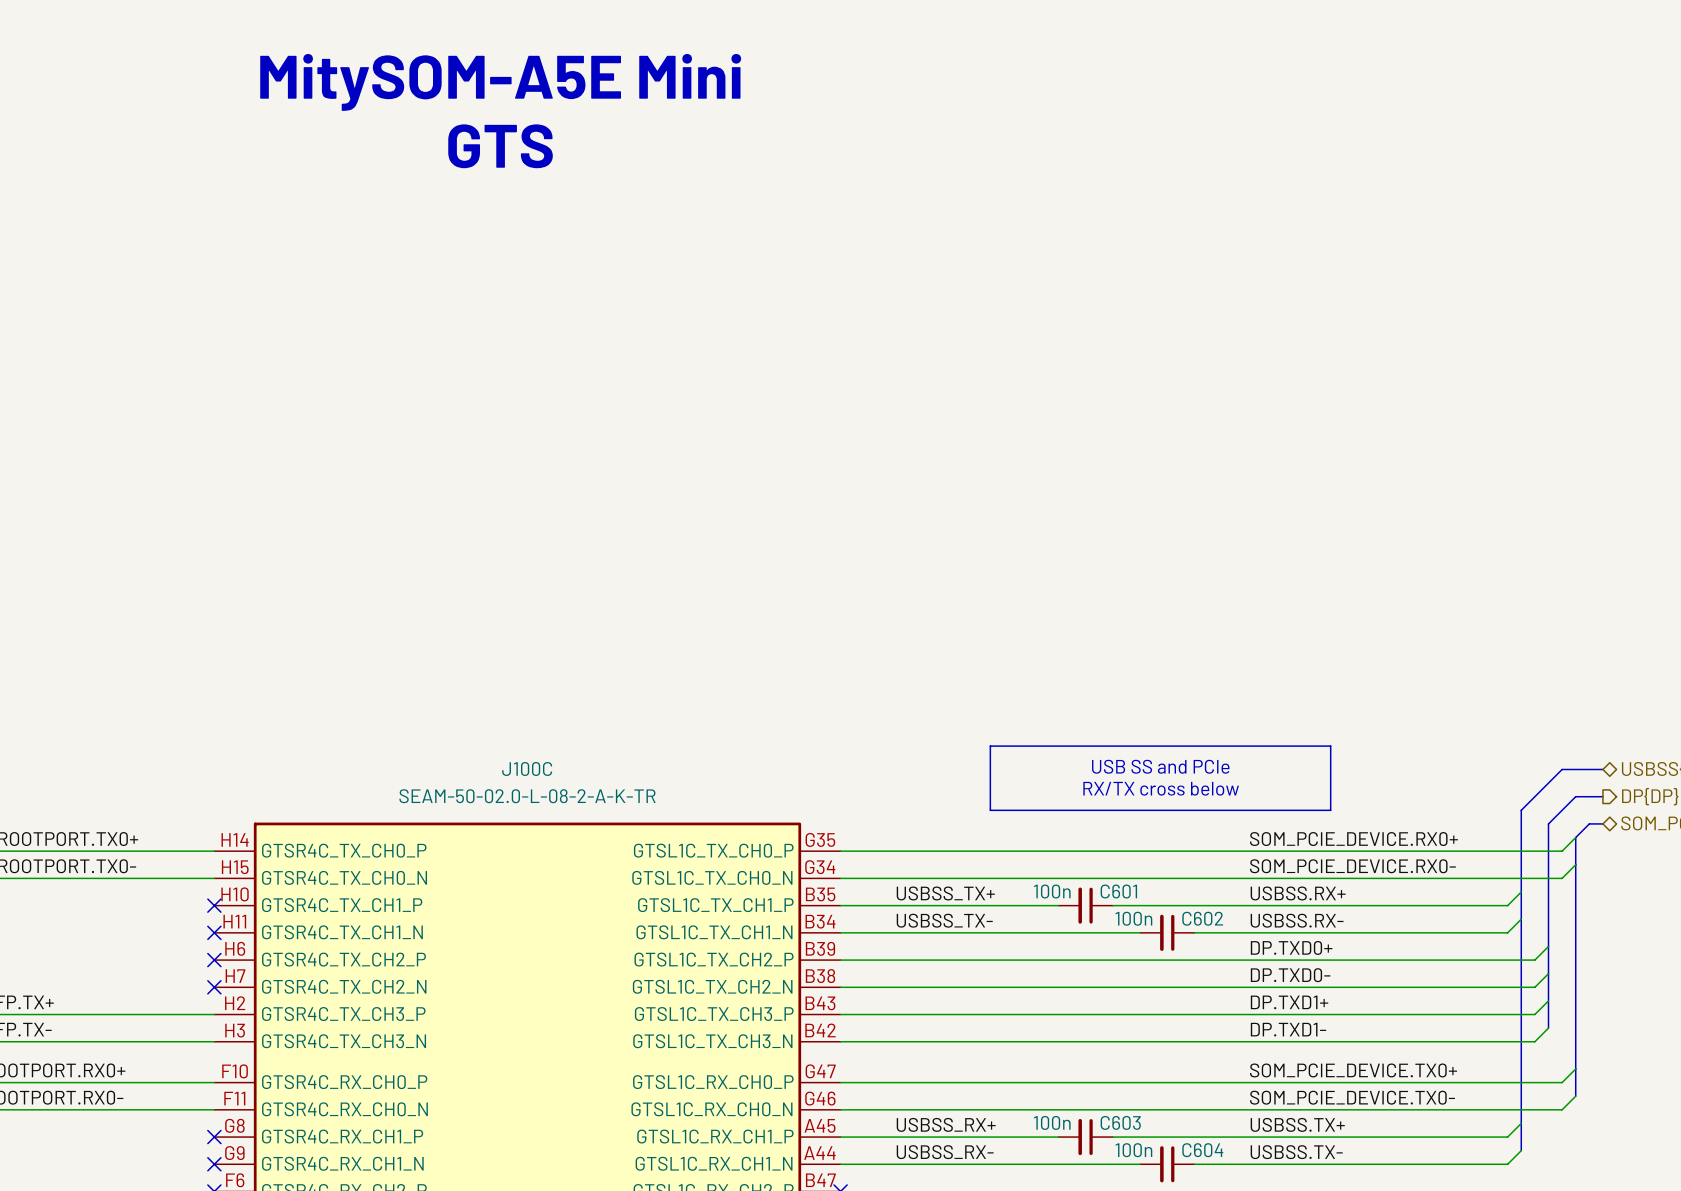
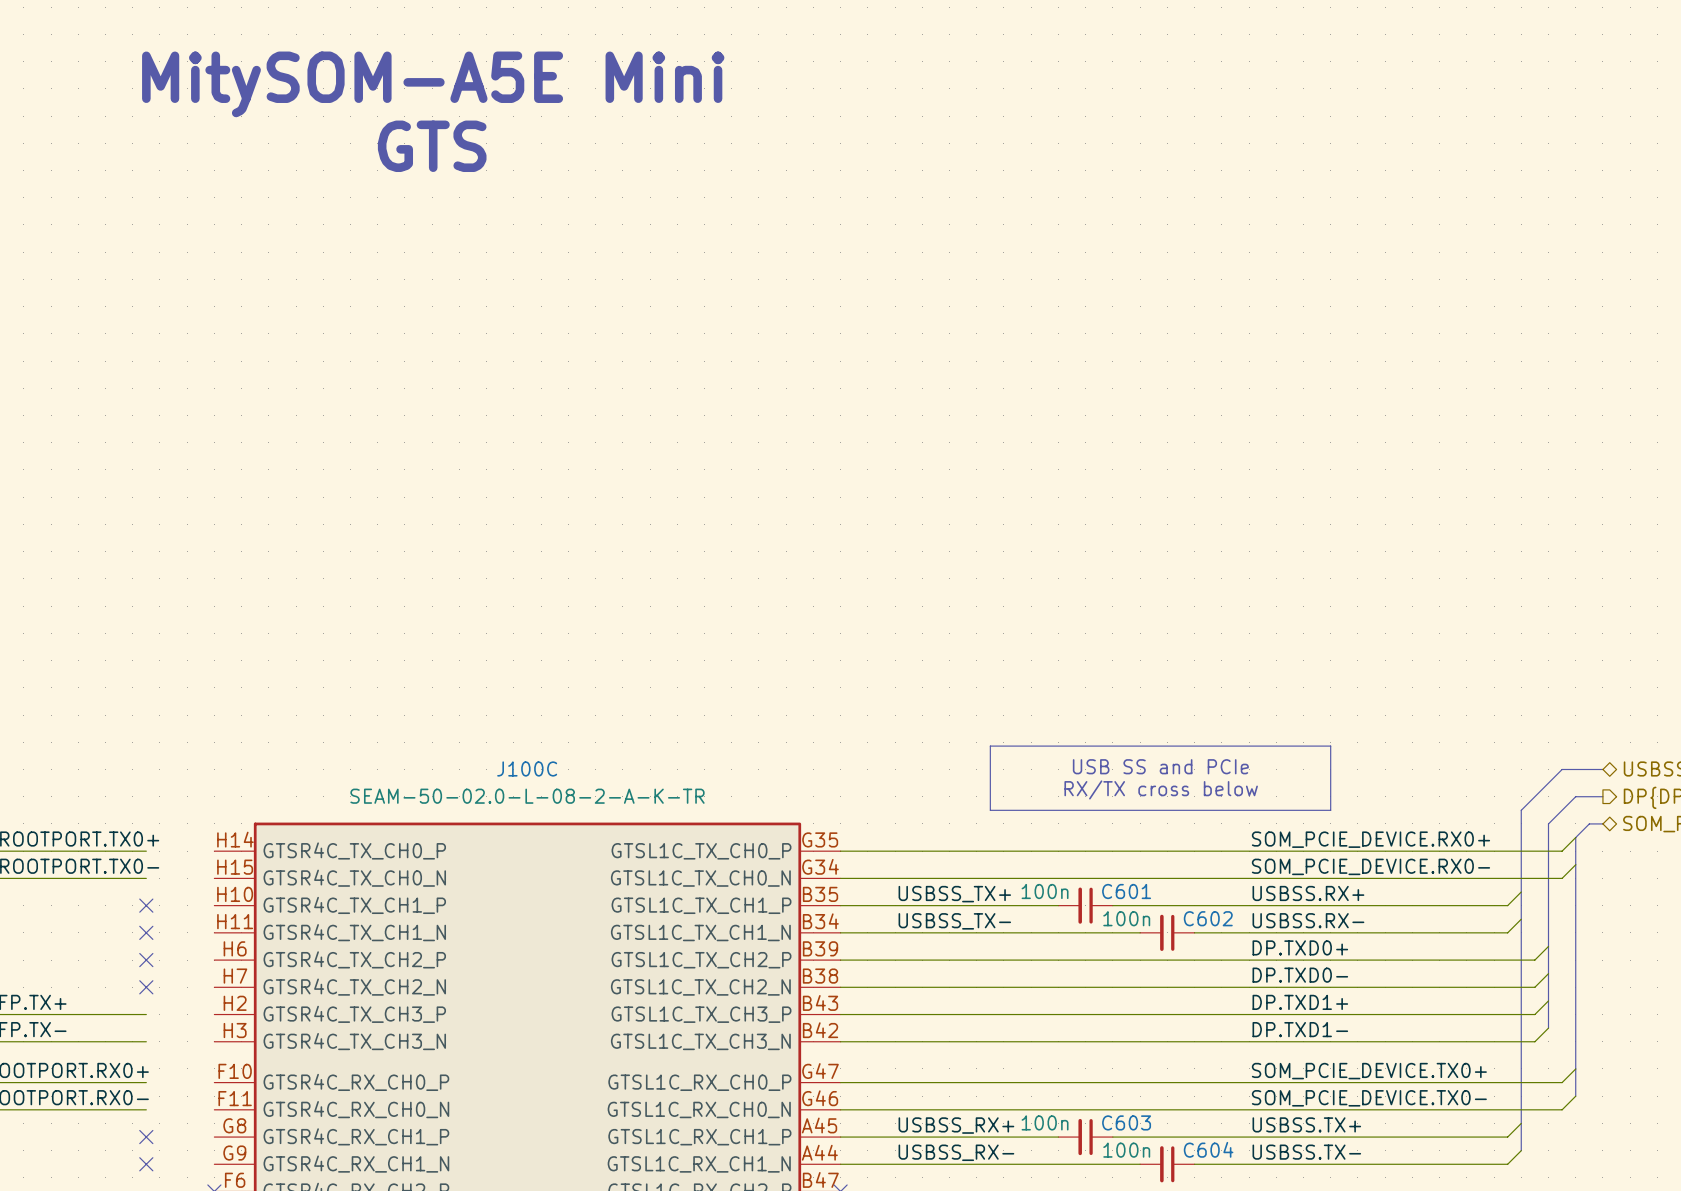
text position: MitySOM-A5E Mini (500, 82) -> MitySOM-A5E Mini (433, 84)
text position: GTS (500, 146) -> GTS (432, 146)
wire: (146, 851) (214, 851) -> none
wire: (146, 878) (214, 878) -> none
no-connect mark: none -> (146, 905)
no-connect mark: (214, 905) -> none
no-connect mark: none -> (146, 932)
no-connect mark: (214, 932) -> none
no-connect mark: none -> (146, 960)
no-connect mark: (214, 960) -> none
no-connect mark: none -> (146, 987)
no-connect mark: (214, 987) -> none
wire: (146, 1014) (214, 1014) -> none
wire: (146, 1041) (214, 1041) -> none
wire: (146, 1082) (214, 1082) -> none
wire: (146, 1109) (214, 1109) -> none
no-connect mark: none -> (146, 1137)
no-connect mark: (214, 1137) -> none
no-connect mark: none -> (146, 1164)
no-connect mark: (214, 1164) -> none

